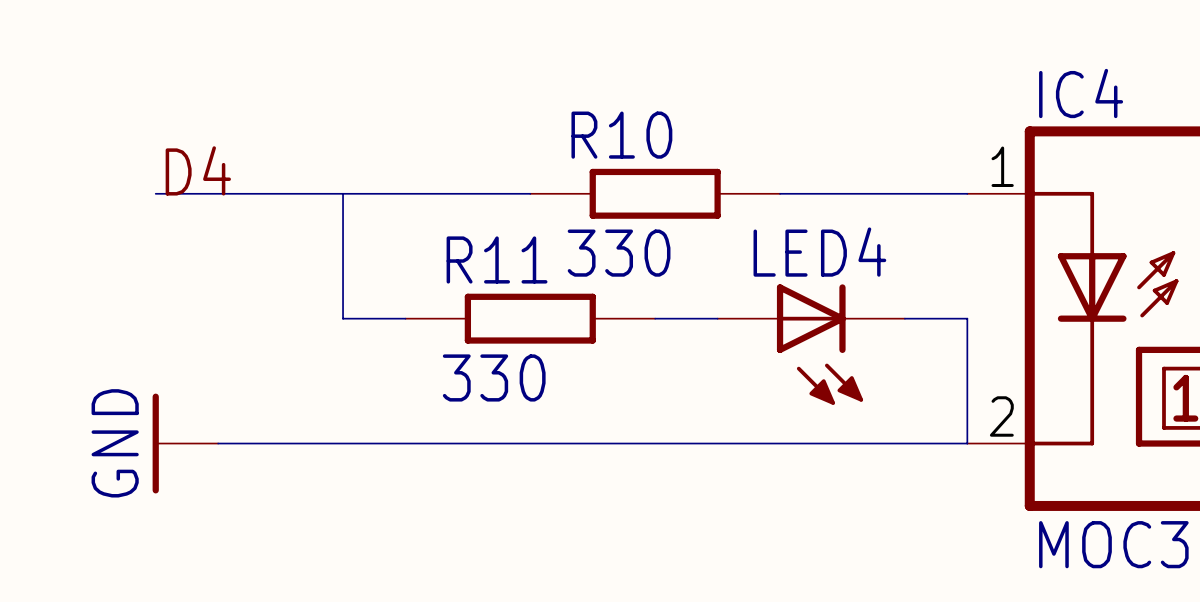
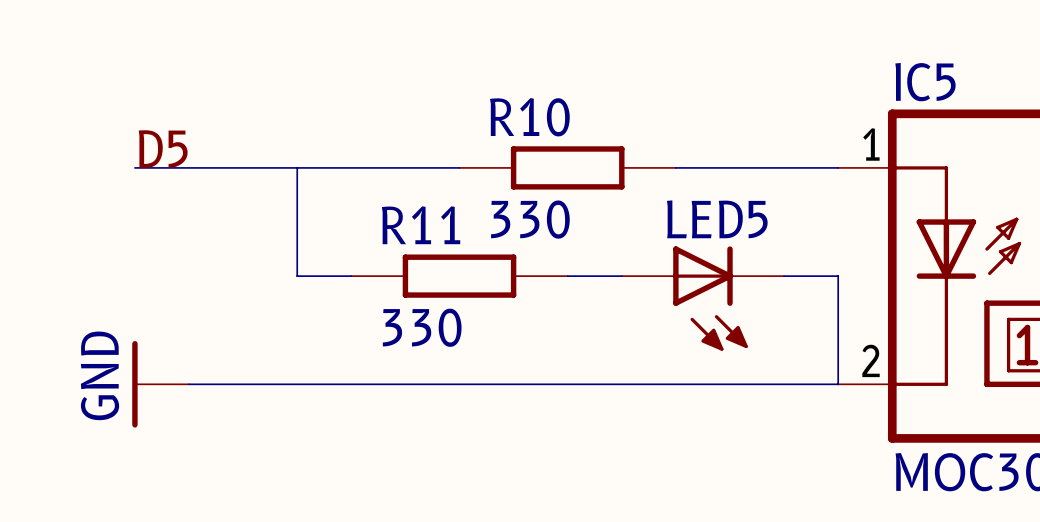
IC4 name: IC4 (1081, 93) -> IC5 (925, 82)
label: D4 (198, 170) -> D5 (163, 149)
LED4 name: LED4 (819, 252) -> LED5 (717, 219)

